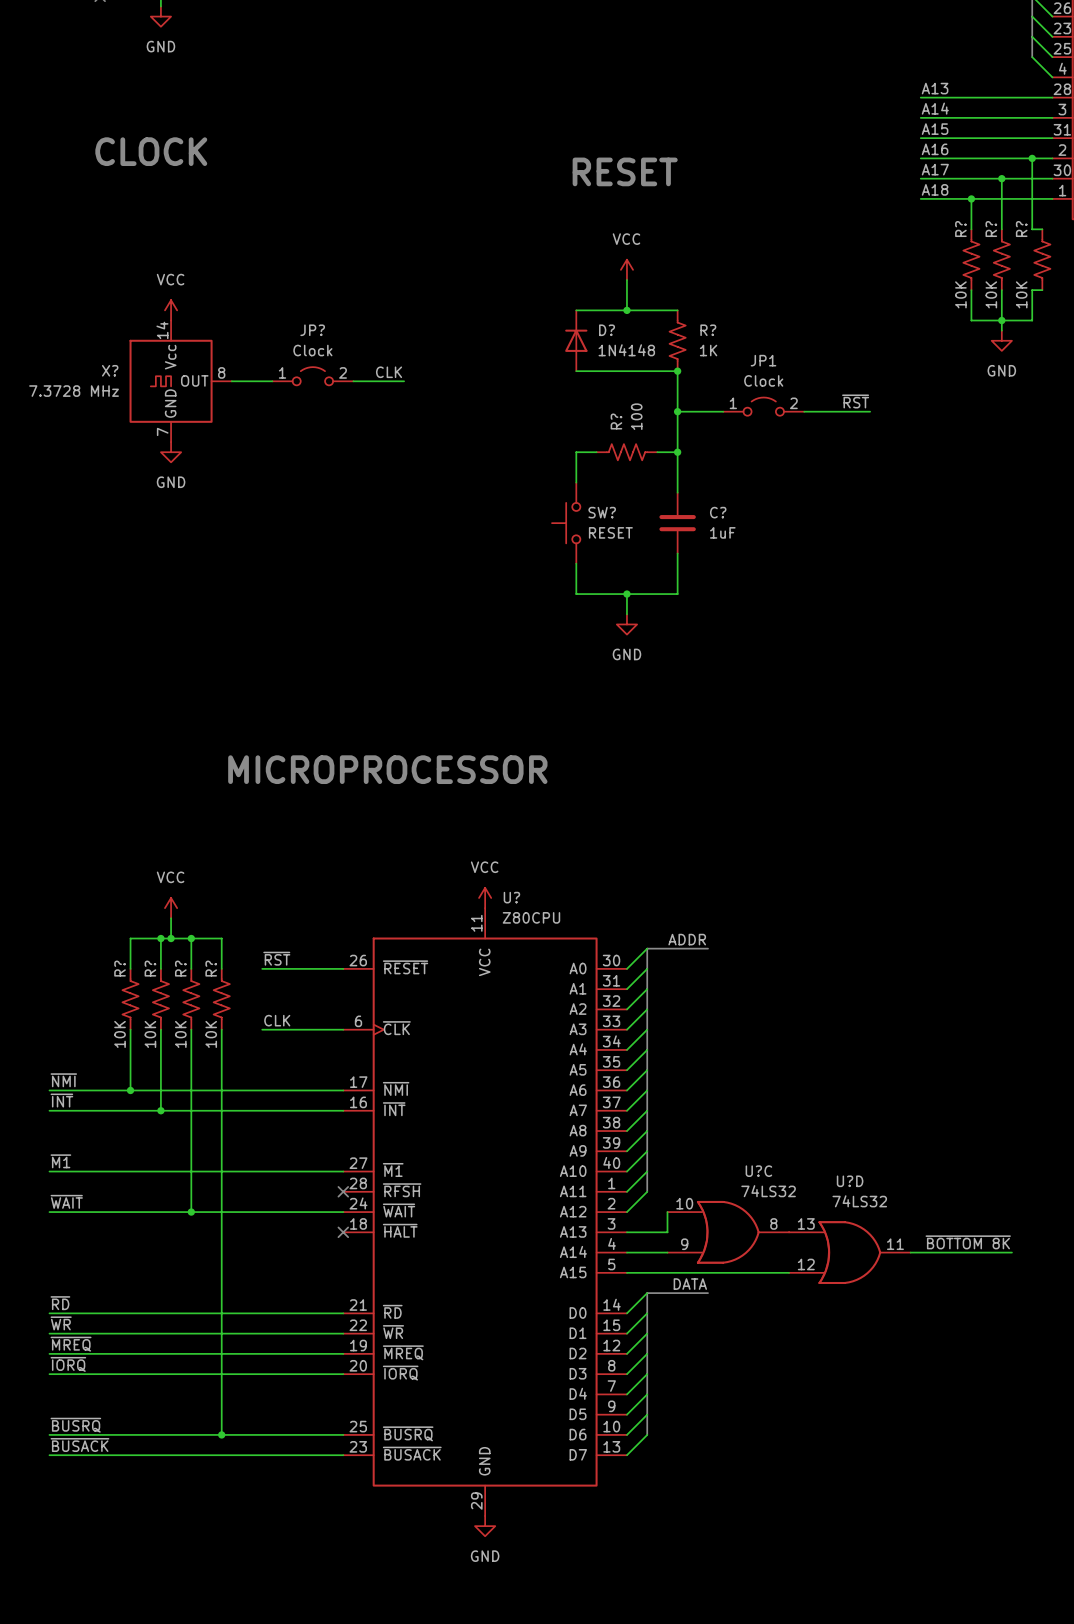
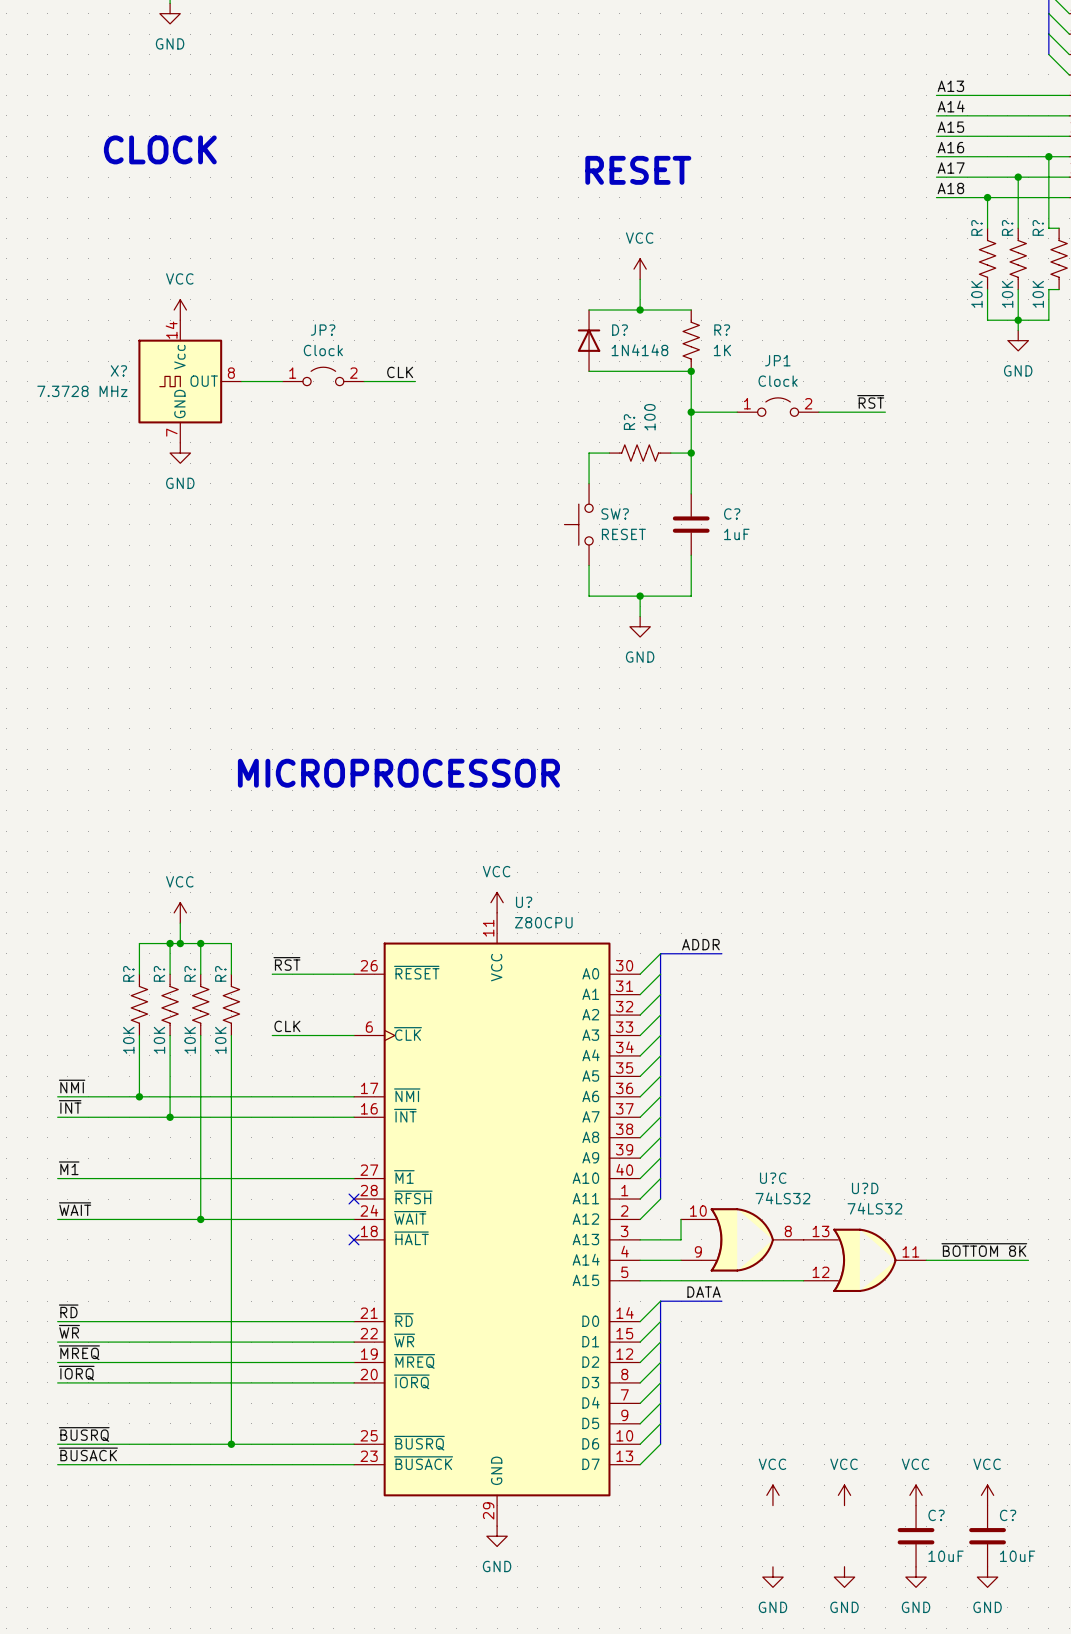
power symbol: none -> VCC (772, 1495)
power symbol: none -> VCC (844, 1495)
power symbol: none -> VCC (916, 1495)
power symbol: none -> VCC (987, 1495)
C?: none -> 10uF (916, 1536)
C?: none -> 10uF (987, 1536)
power symbol: none -> GND (772, 1577)
power symbol: none -> GND (844, 1577)
power symbol: none -> GND (916, 1577)
power symbol: none -> GND (987, 1577)

